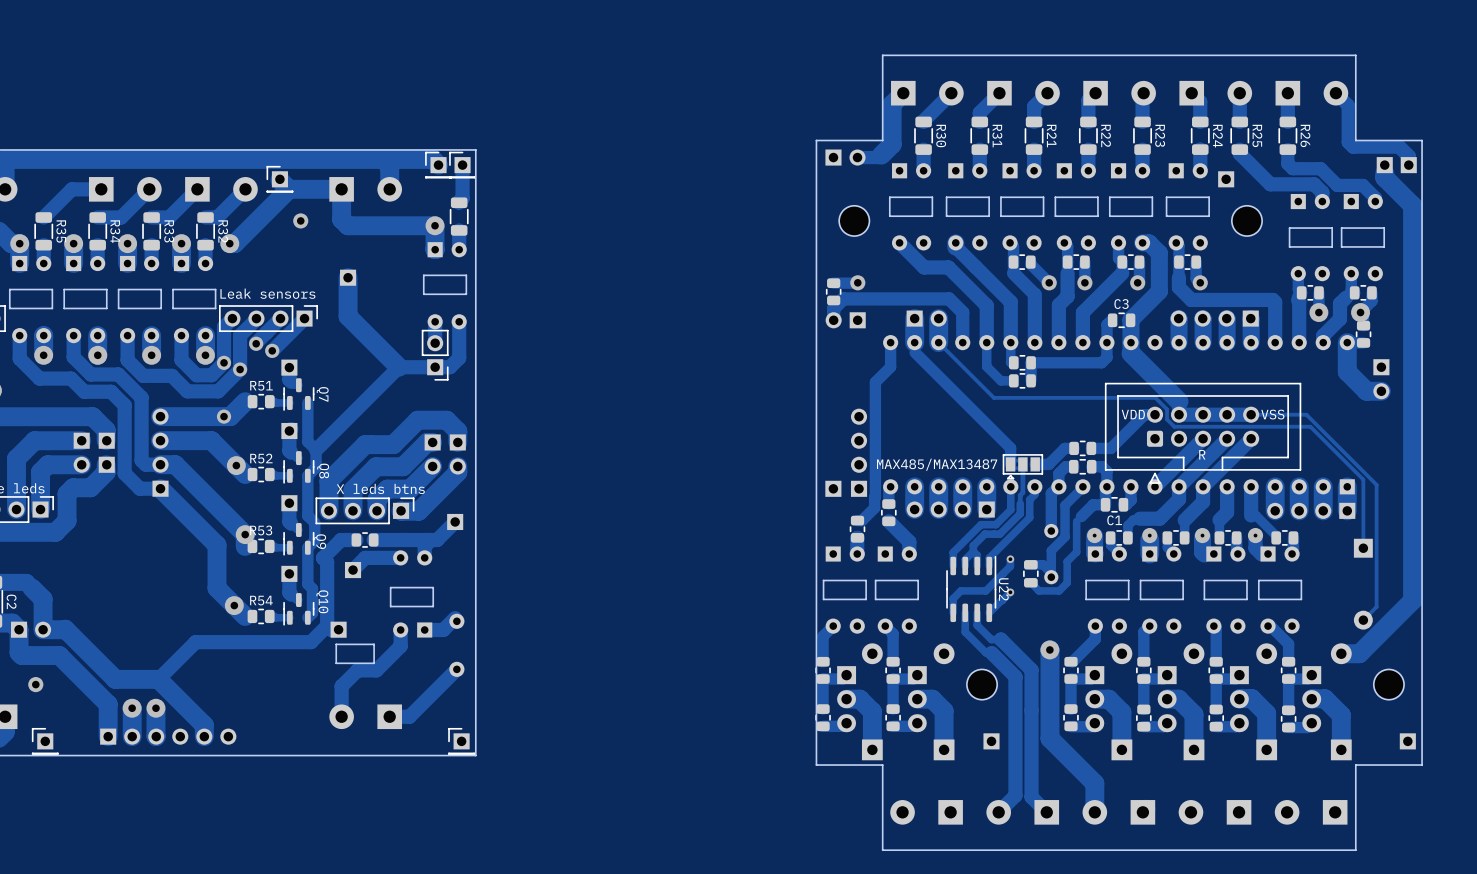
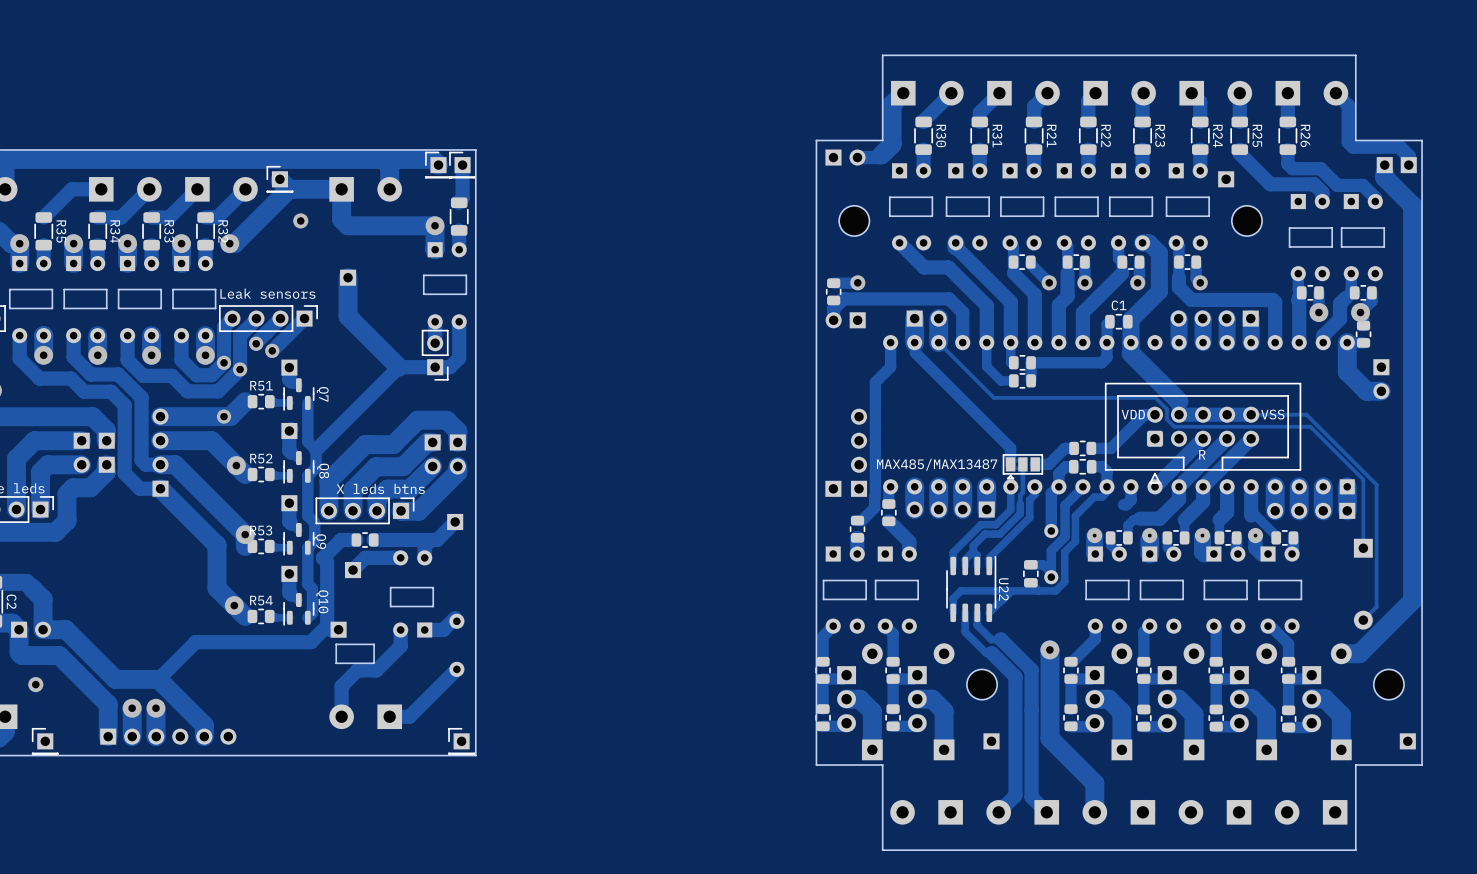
C3: (1121, 320) -> none
track: (1106, 486) (1105, 504) (1093, 504) (1081, 516) -> none
C1 position: (1114, 504) -> (1118, 321)
C1 name position: C1 (1114, 520) -> C1 (1119, 305)
track: (1076, 521) (1076, 552) (1067, 561) (1067, 582) (1059, 590) (1055, 590) -> (1106, 492) (1102, 497) (1094, 497) (1075, 515) (1075, 541) (1064, 551) (1064, 581) (1055, 590)
track: (1010, 559) (1010, 566) (985, 590) -> (1039, 590) (985, 590)
via: (1010, 559) -> none
via: (1010, 592) -> none

